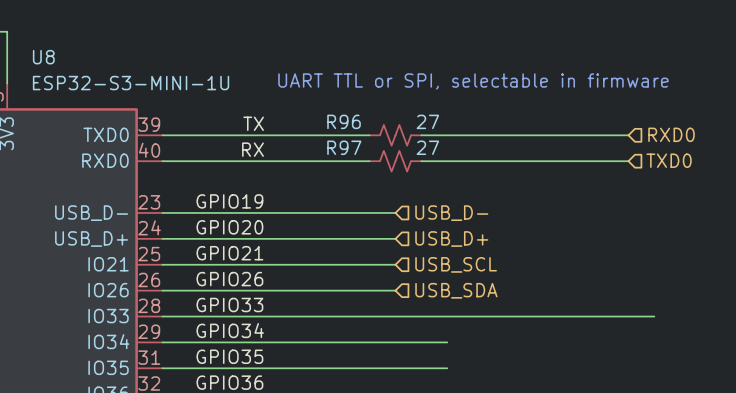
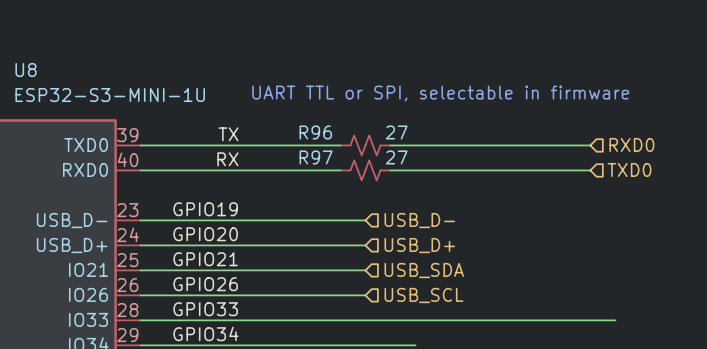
hierarchical label: USB_SCL (456, 264) -> USB_SDA (424, 270)
hierarchical label: USB_SDA (456, 290) -> USB_SCL (423, 295)

